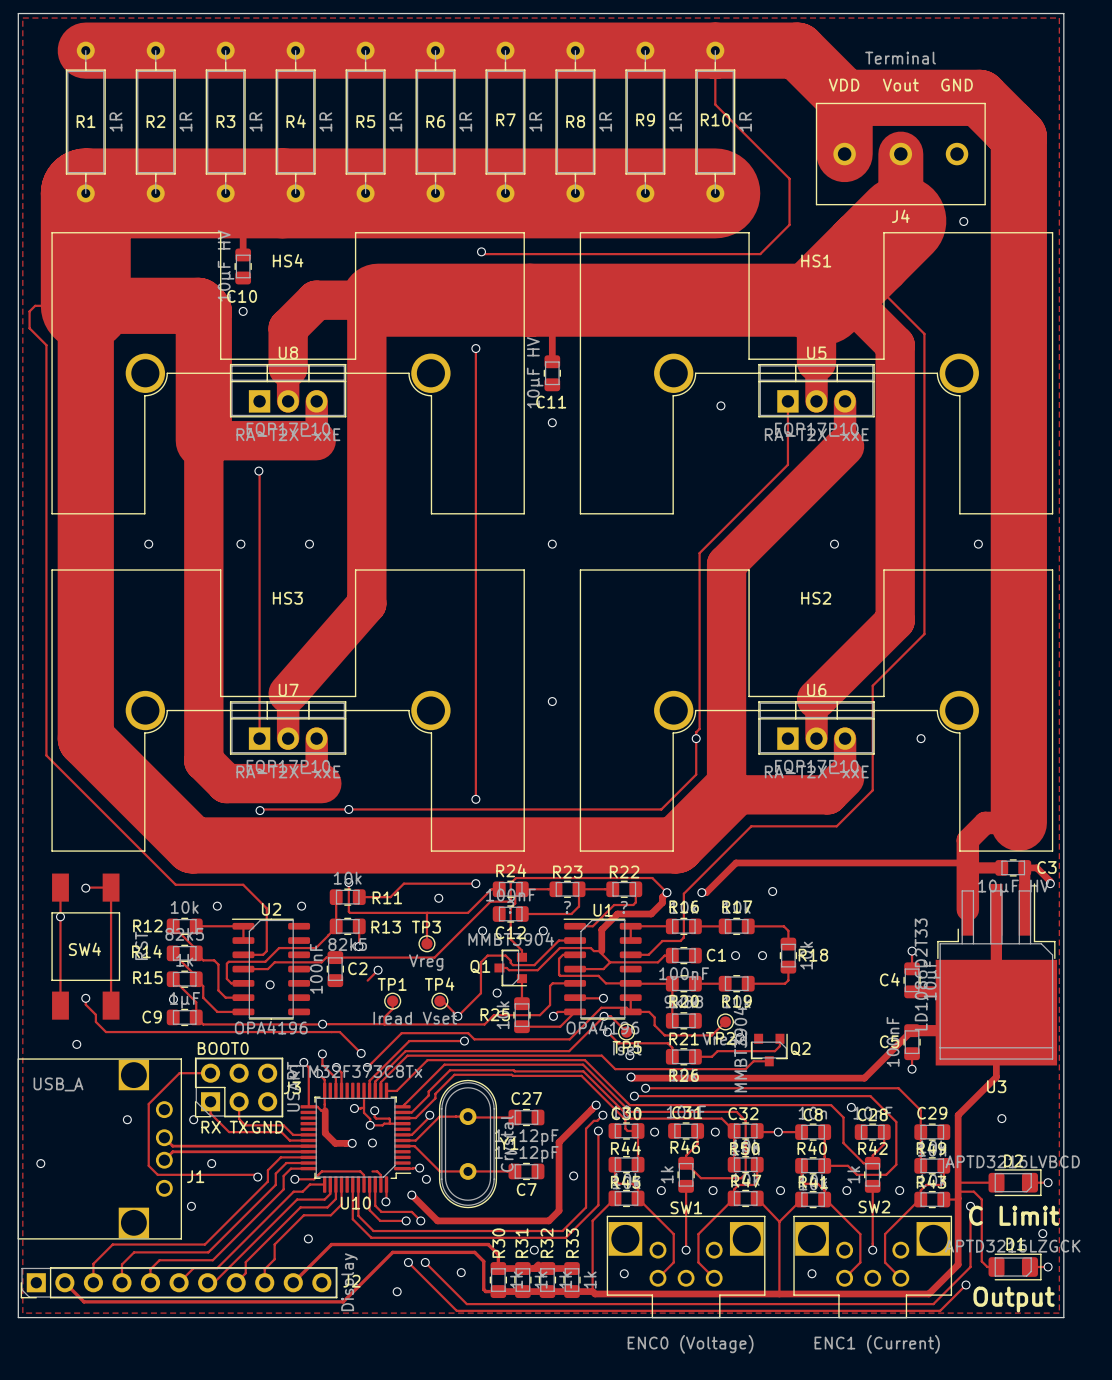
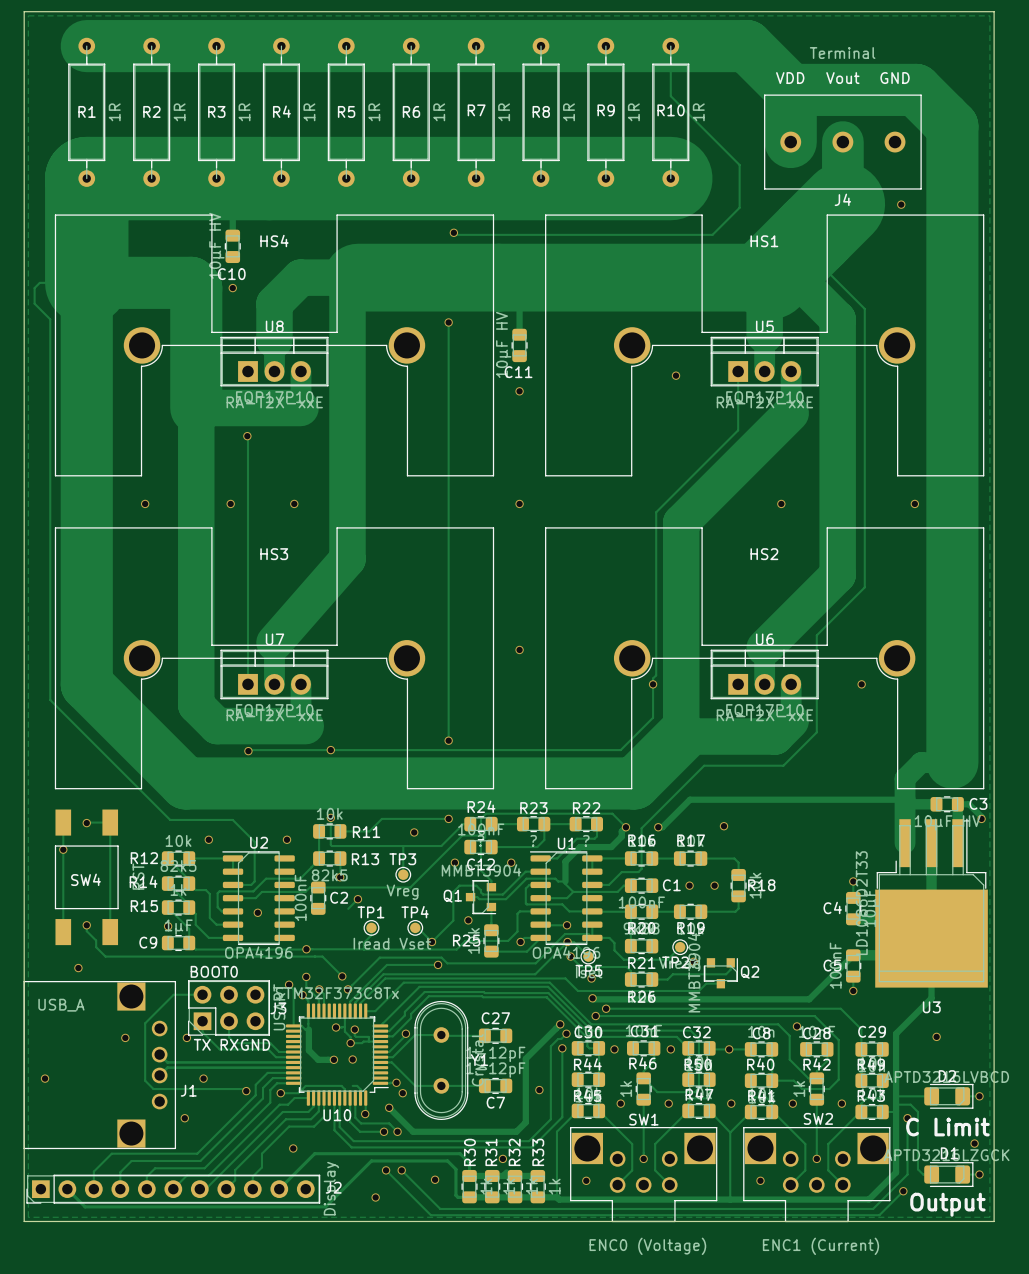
text: RX (211, 1127) -> TX (202, 1044)
text: TX (238, 1127) -> RX (229, 1044)

